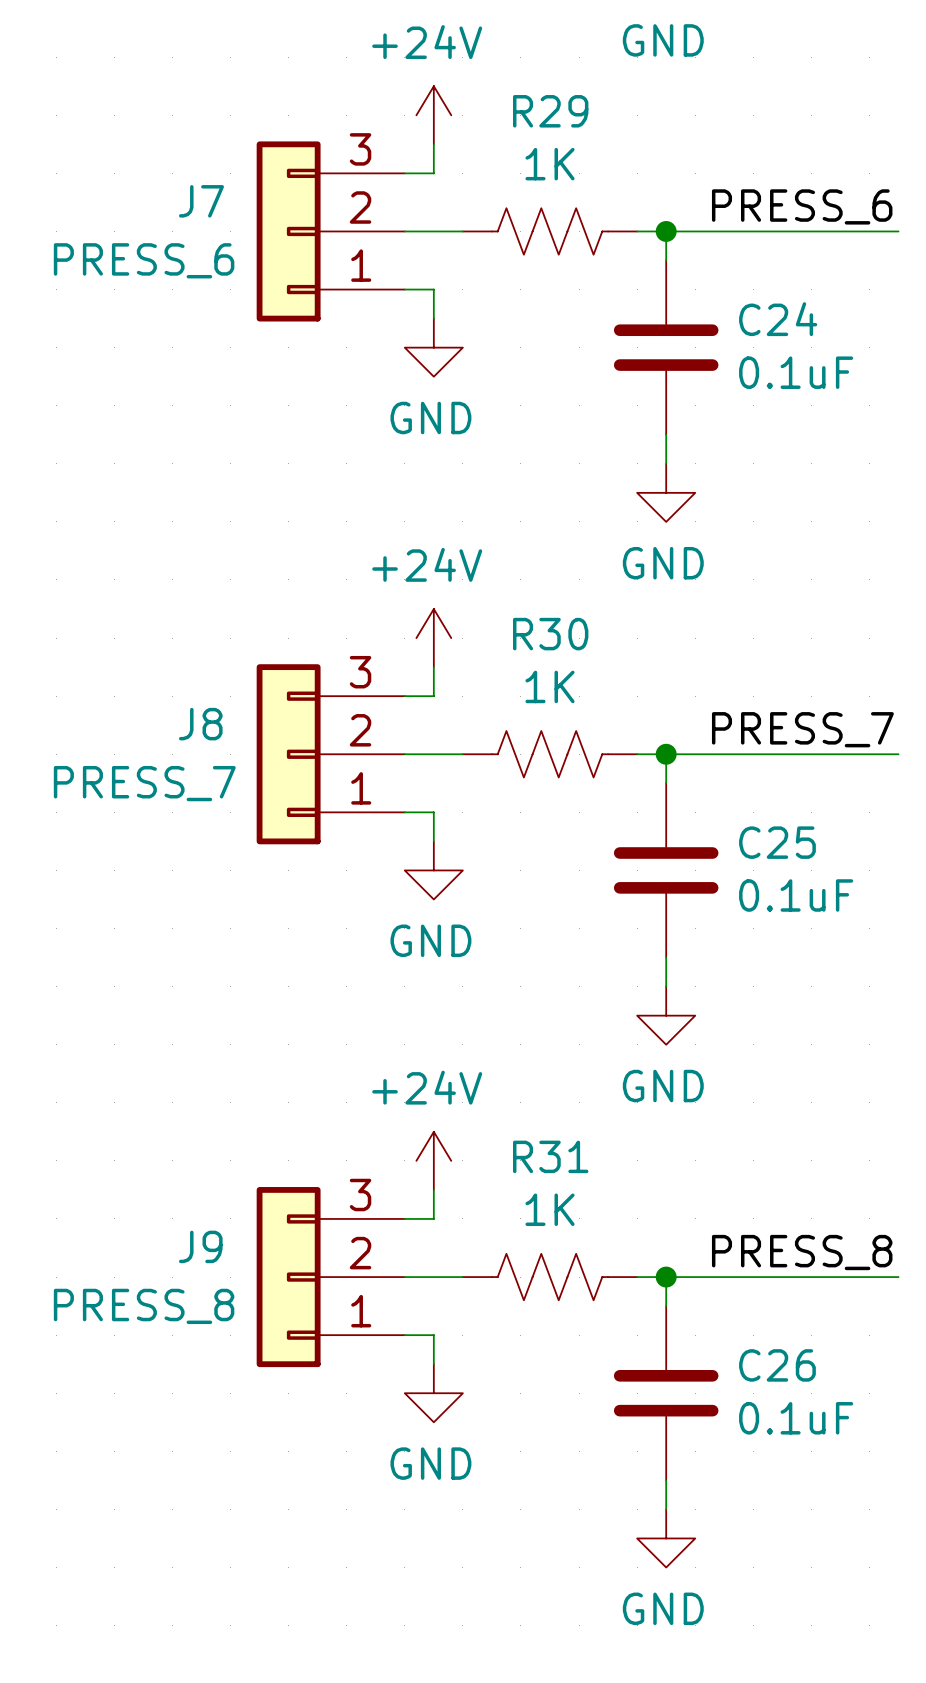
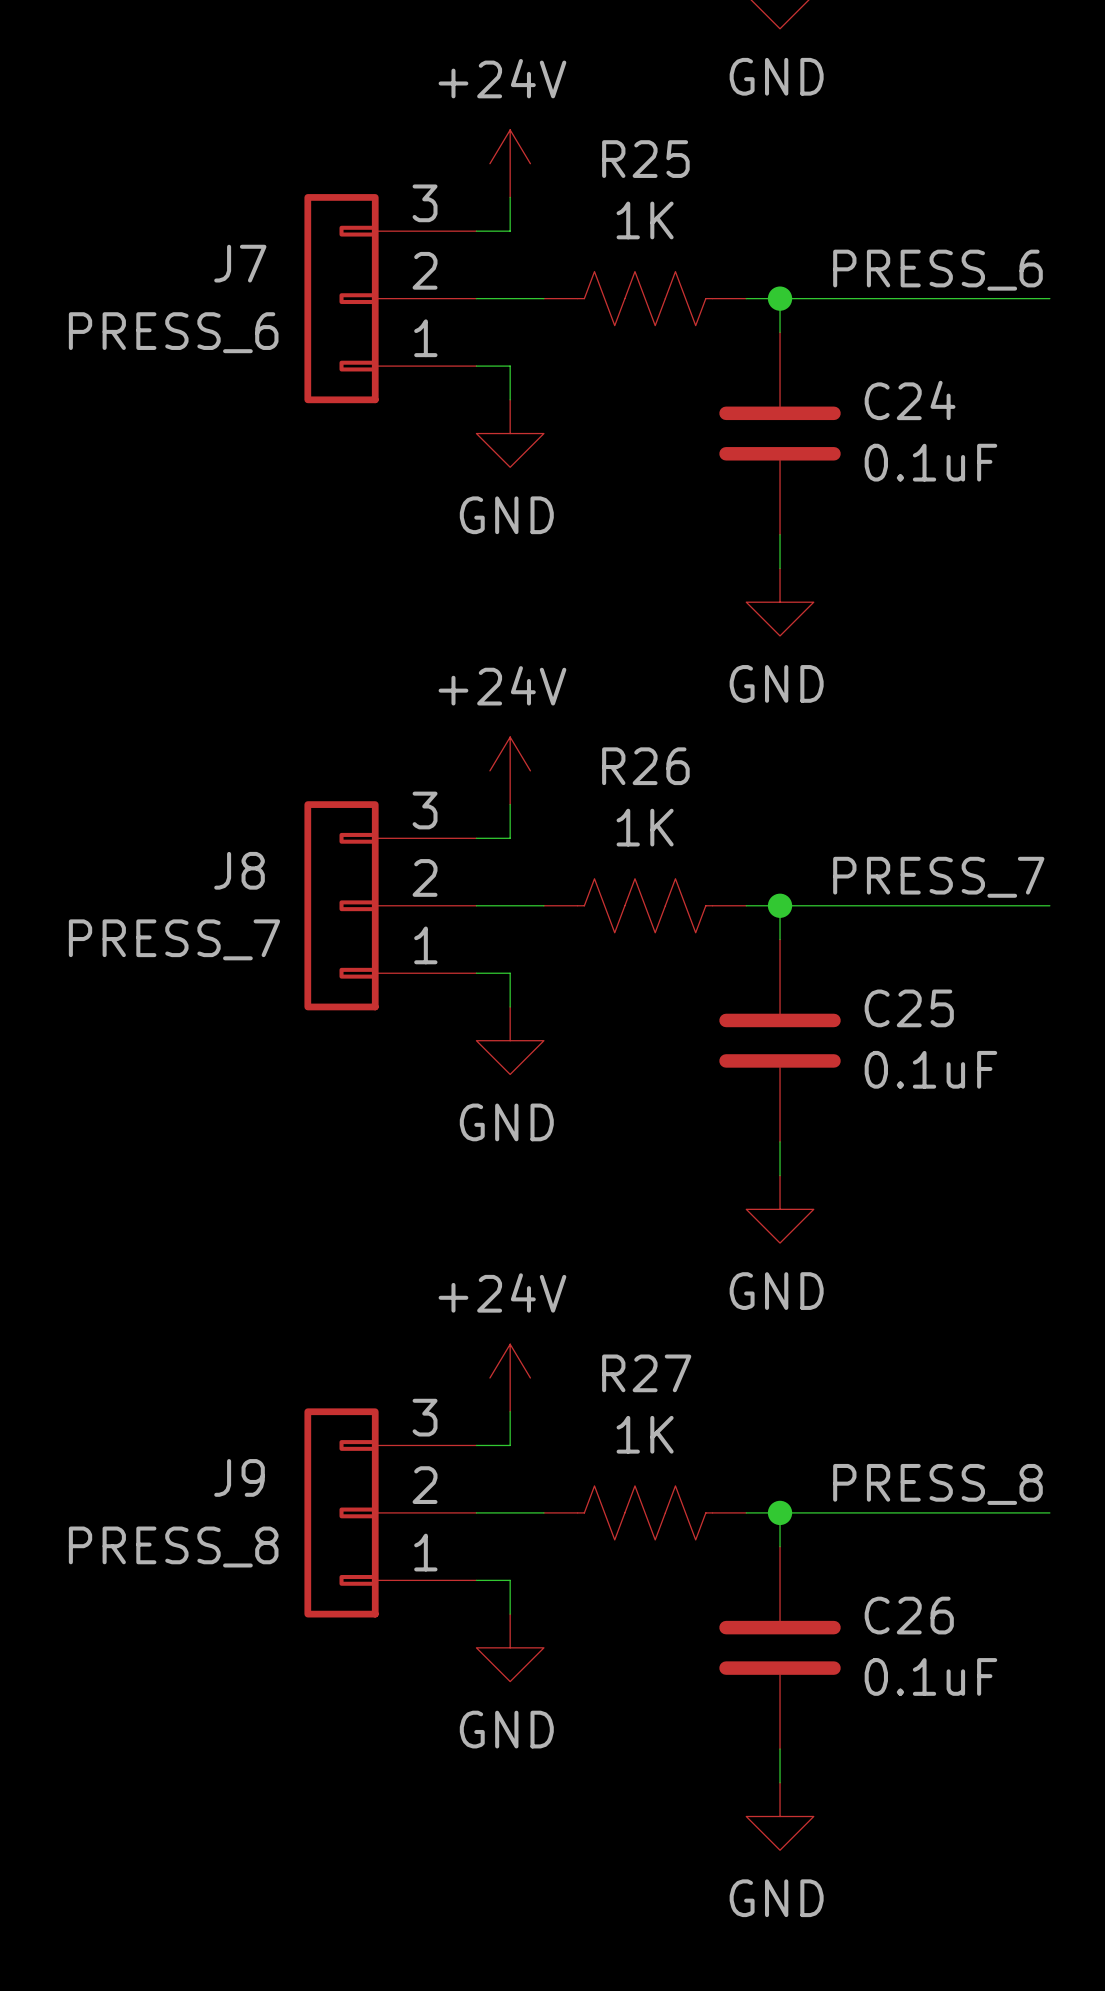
R29 name: R29 (550, 111) -> R25 (645, 159)
R30 name: R30 (550, 634) -> R26 (645, 766)
R31 name: R31 (550, 1156) -> R27 (646, 1373)

